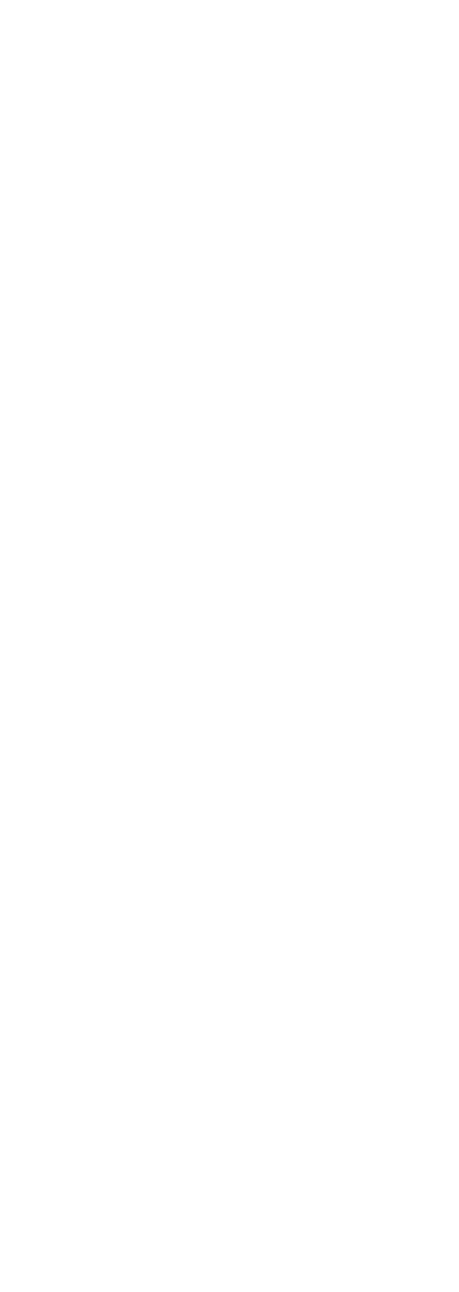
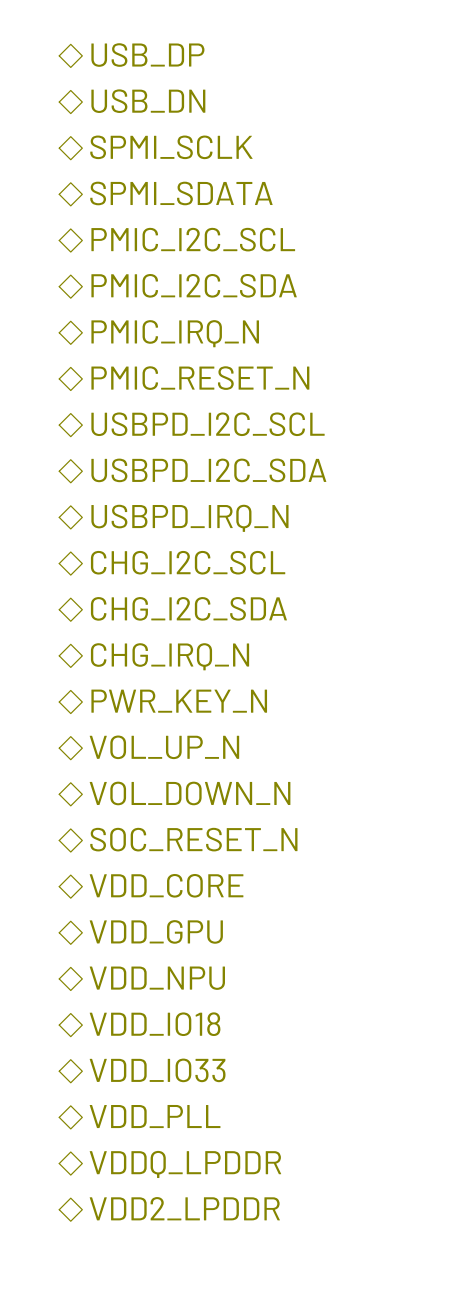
hierarchical label: none -> USB_DP (147, 55)
hierarchical label: none -> USB_DN (148, 101)
hierarchical label: none -> SPMI_SCLK (171, 147)
hierarchical label: none -> SPMI_SDATA (181, 193)
hierarchical label: none -> PMIC_I2C_SCL (193, 239)
hierarchical label: none -> PMIC_I2C_SDA (194, 285)
hierarchical label: none -> PMIC_IRQ_N (175, 333)
hierarchical label: none -> PMIC_RESET_N (200, 378)
hierarchical label: none -> USBPD_I2C_SCL (208, 424)
hierarchical label: none -> USBPD_I2C_SDA (208, 470)
hierarchical label: none -> USBPD_IRQ_N (189, 518)
hierarchical label: none -> CHG_I2C_SCL (188, 562)
hierarchical label: none -> CHG_I2C_SDA (188, 608)
hierarchical label: none -> CHG_IRQ_N (170, 656)
hierarchical label: none -> PWR_KEY_N (179, 701)
hierarchical label: none -> VOL_UP_N (164, 747)
hierarchical label: none -> VOL_DOWN_N (190, 793)
hierarchical label: none -> SOC_RESET_N (193, 839)
hierarchical label: none -> VDD_CORE (166, 885)
hierarchical label: none -> VDD_GPU (156, 931)
hierarchical label: none -> VDD_NPU (157, 978)
hierarchical label: none -> VDD_IO18 (155, 1024)
hierarchical label: none -> VDD_IO33 (157, 1070)
hierarchical label: none -> VDD_PLL (155, 1116)
hierarchical label: none -> VDDQ_LPDDR (185, 1164)
hierarchical label: none -> VDD2_LPDDR (184, 1208)

